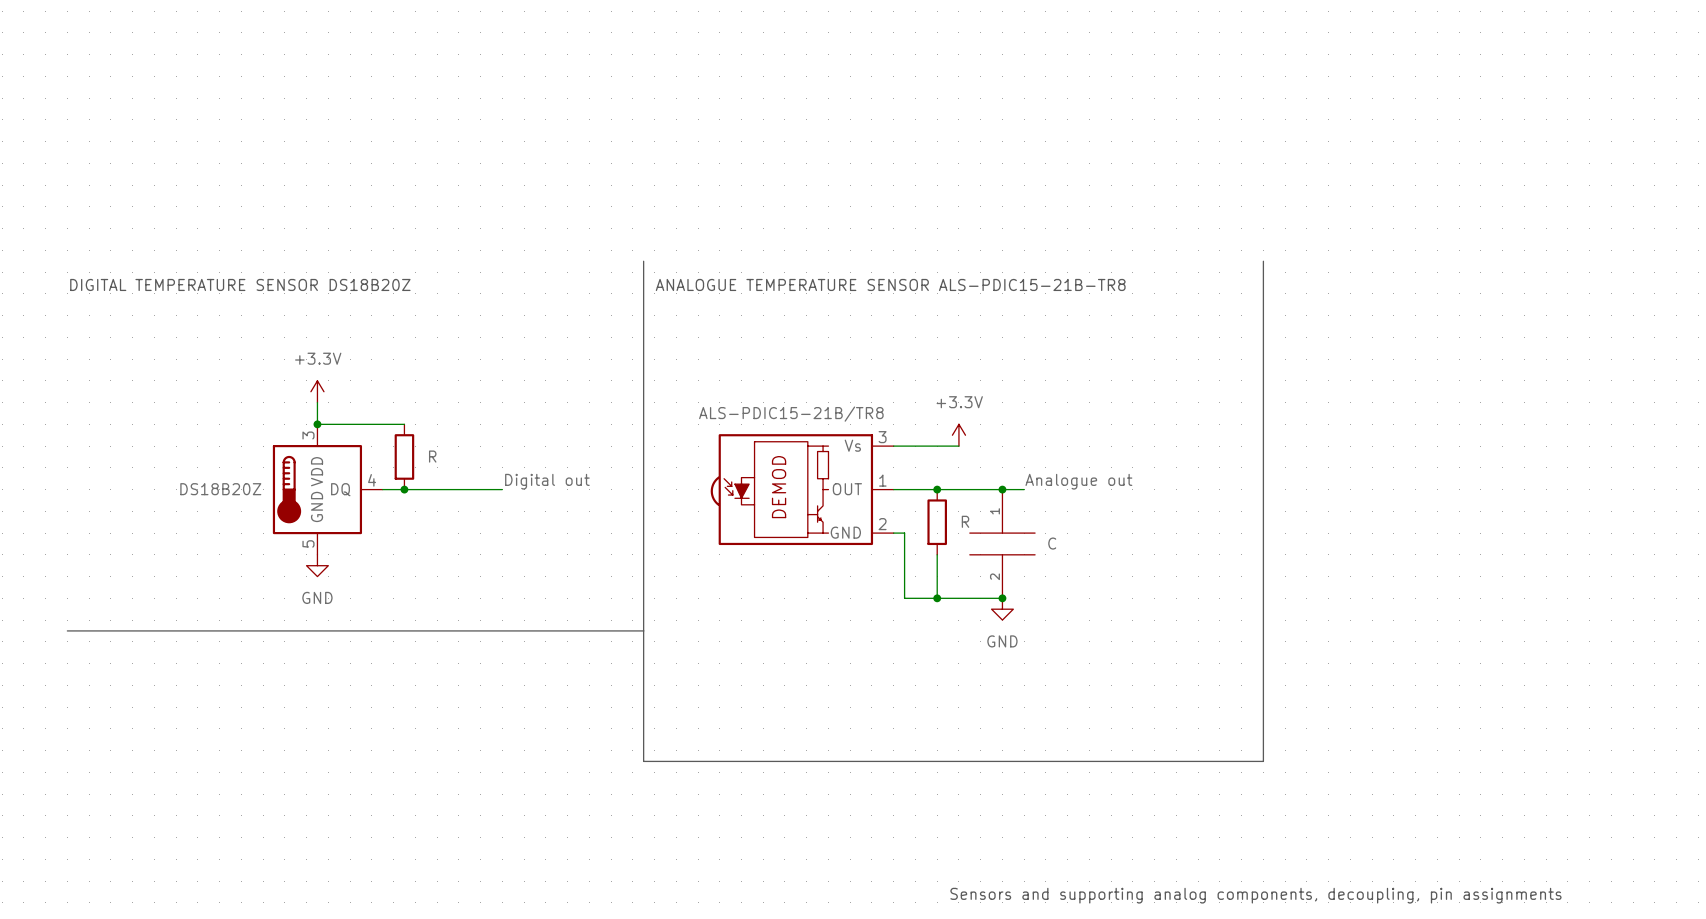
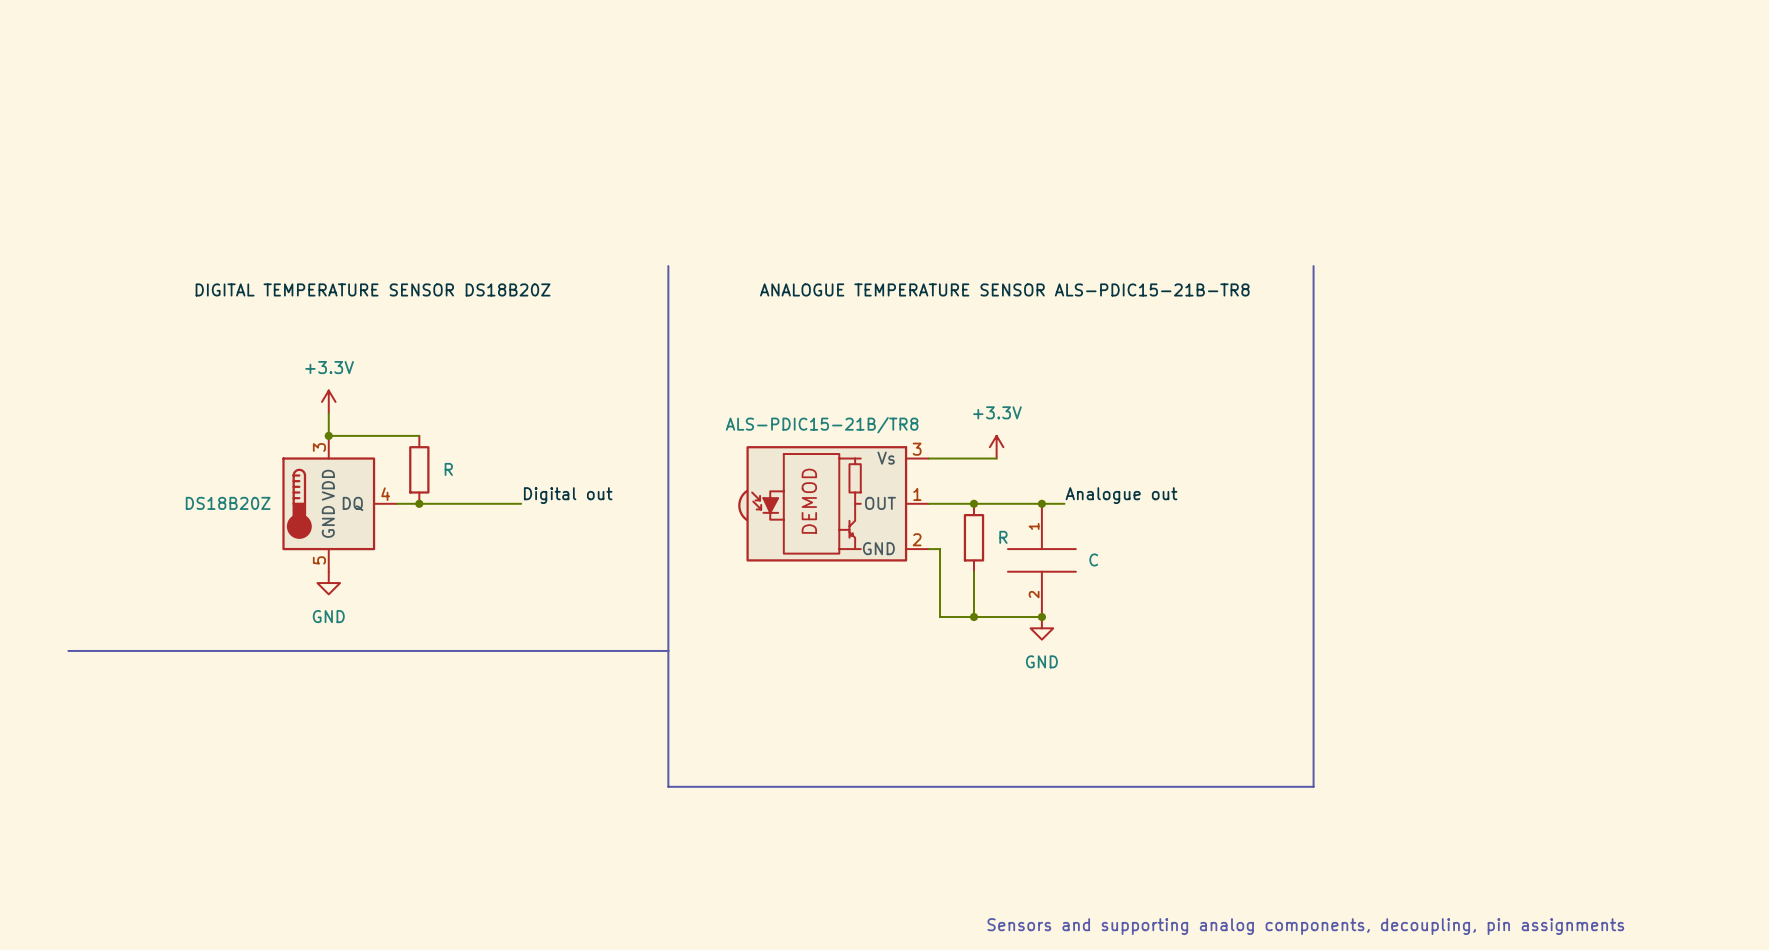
text: DIGITAL TEMPERATURE SENSOR DS18B20Z (240, 284) -> none
label: none -> DIGITAL TEMPERATURE SENSOR DS18B20Z (373, 289)
text: ANALOGUE TEMPERATURE SENSOR ALS-PDIC15-21B-TR8 (890, 284) -> none
label: none -> ANALOGUE TEMPERATURE SENSOR ALS-PDIC15-21B-TR8 (1004, 289)

